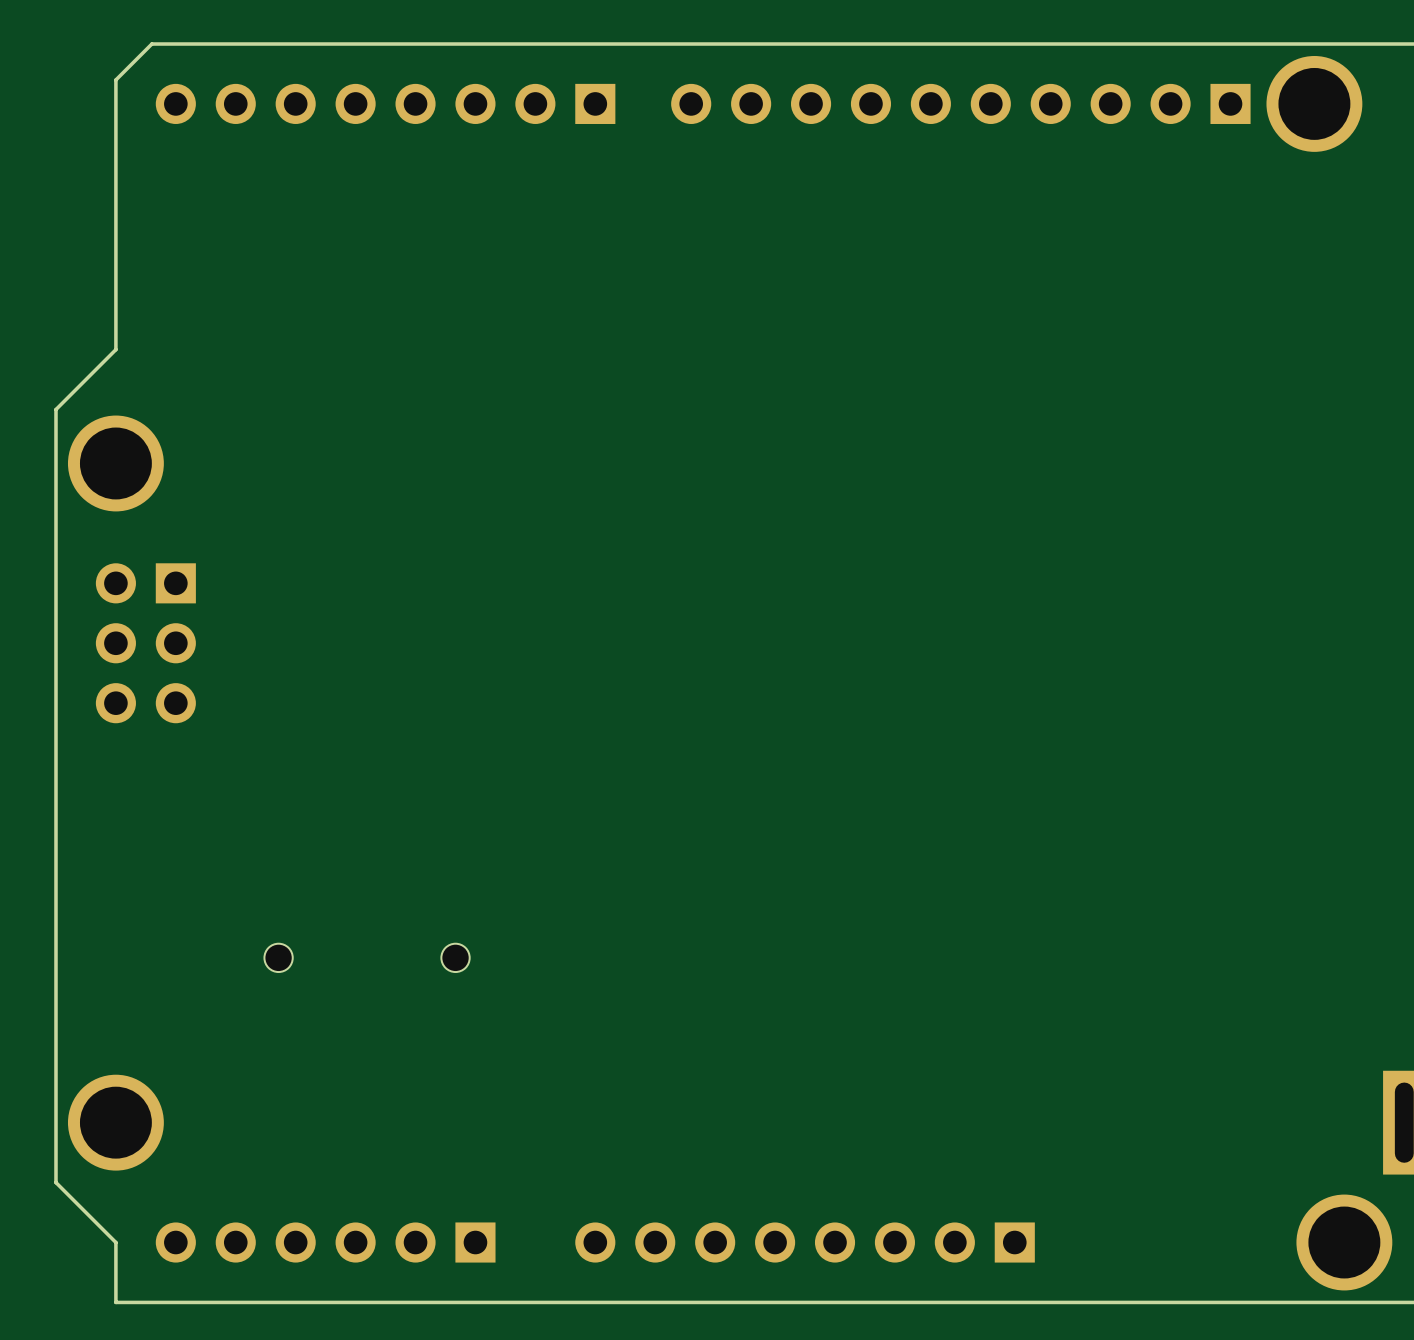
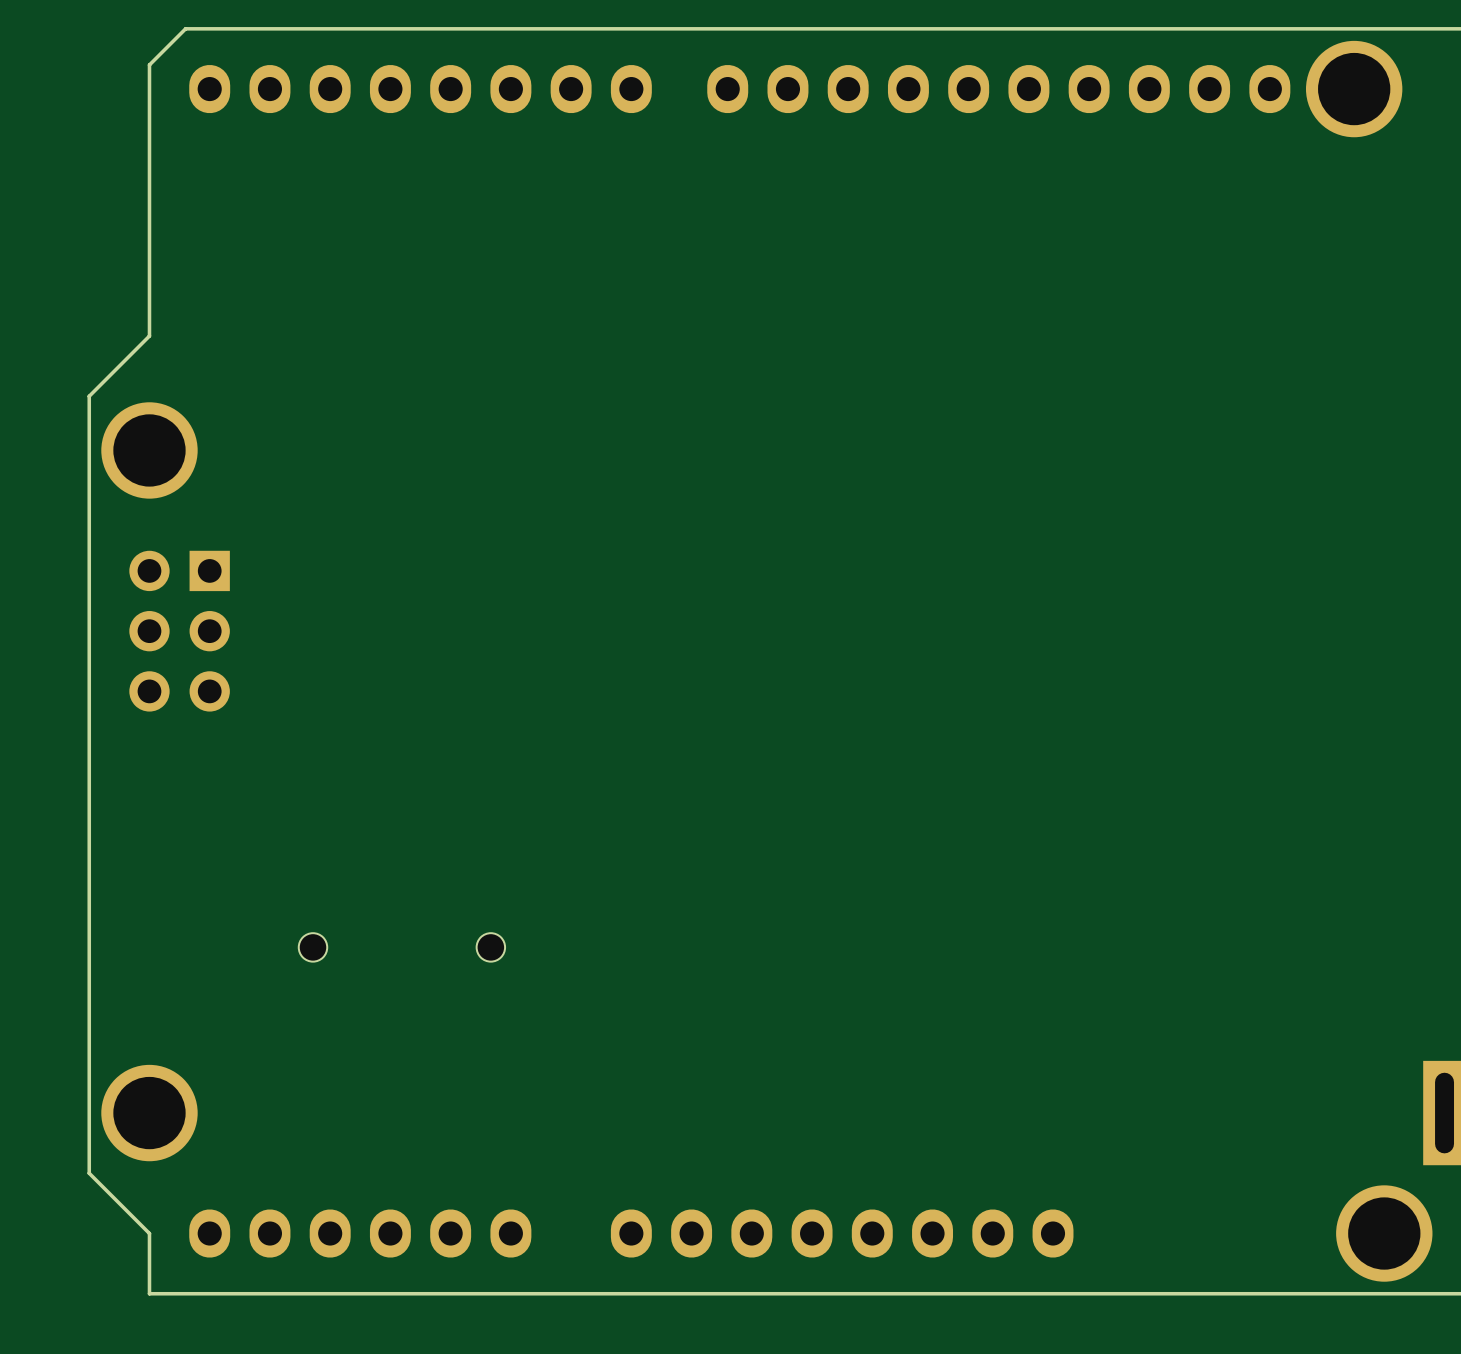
part footprint: [155, 83, 616, 124] -> [189, 64, 652, 114]
part footprint: [671, 83, 1251, 124] -> [707, 64, 1291, 114]
part footprint: [155, 1222, 496, 1263] -> [189, 1209, 532, 1258]
part footprint: [575, 1222, 1035, 1263] -> [610, 1209, 1074, 1258]

